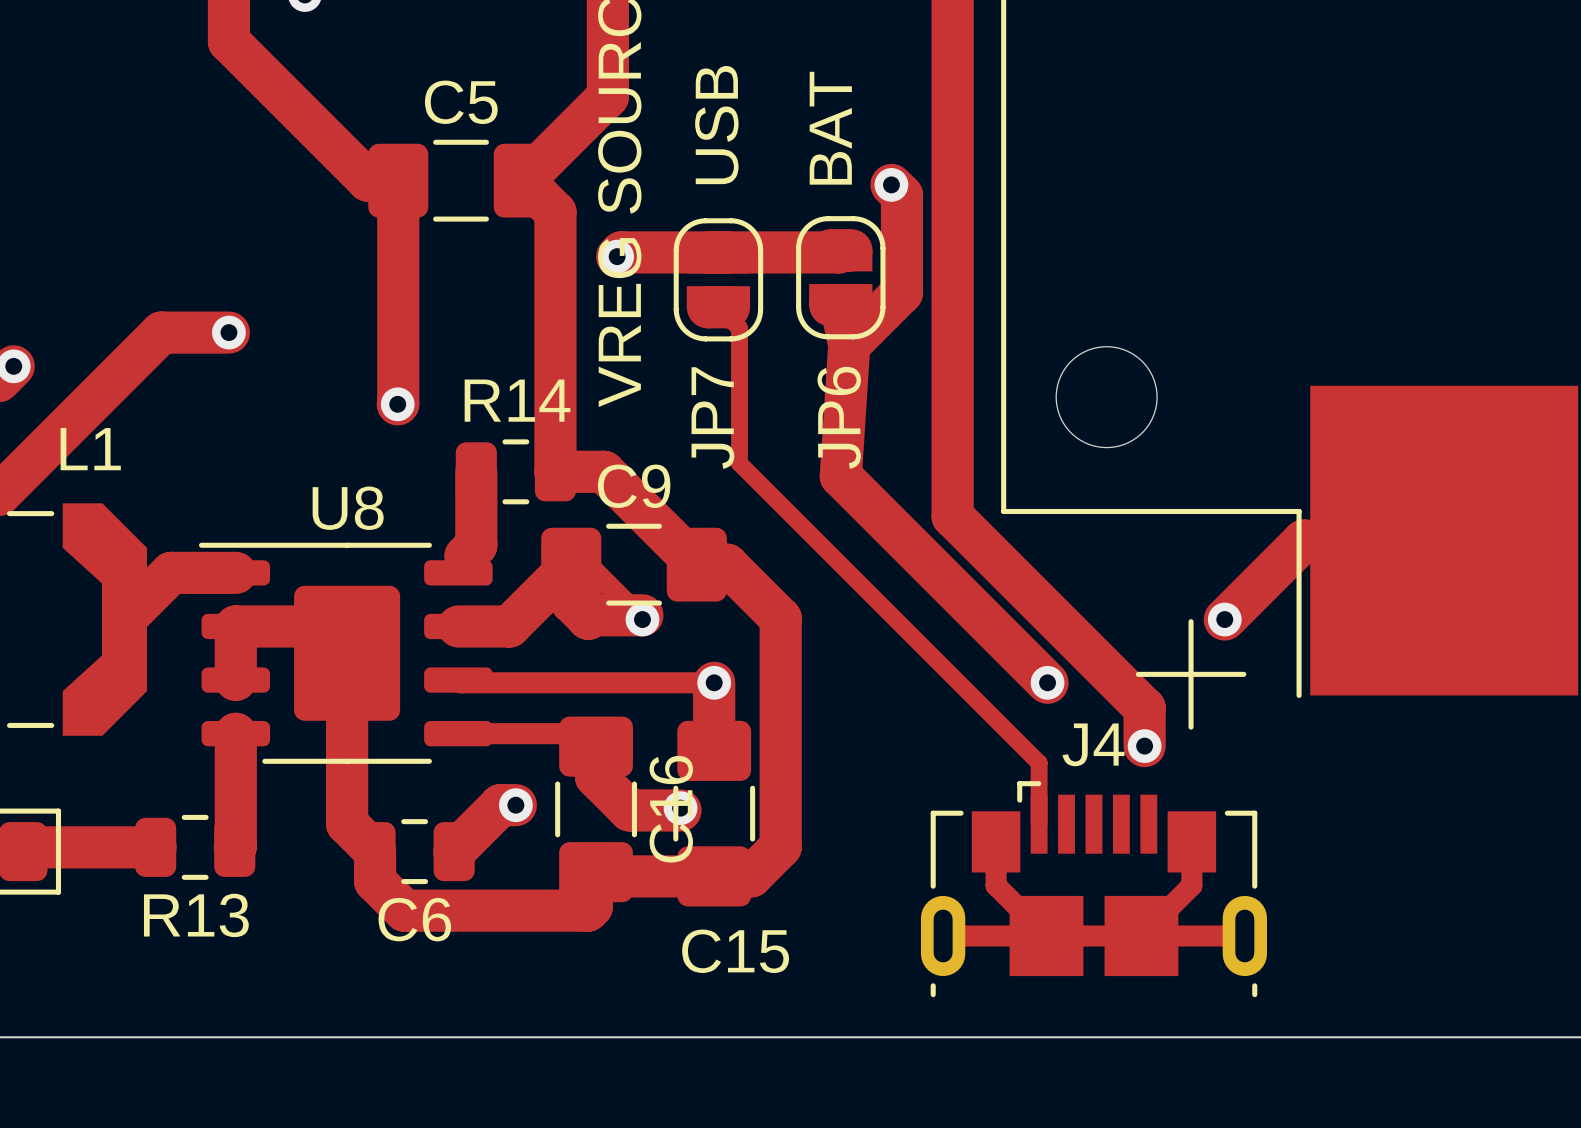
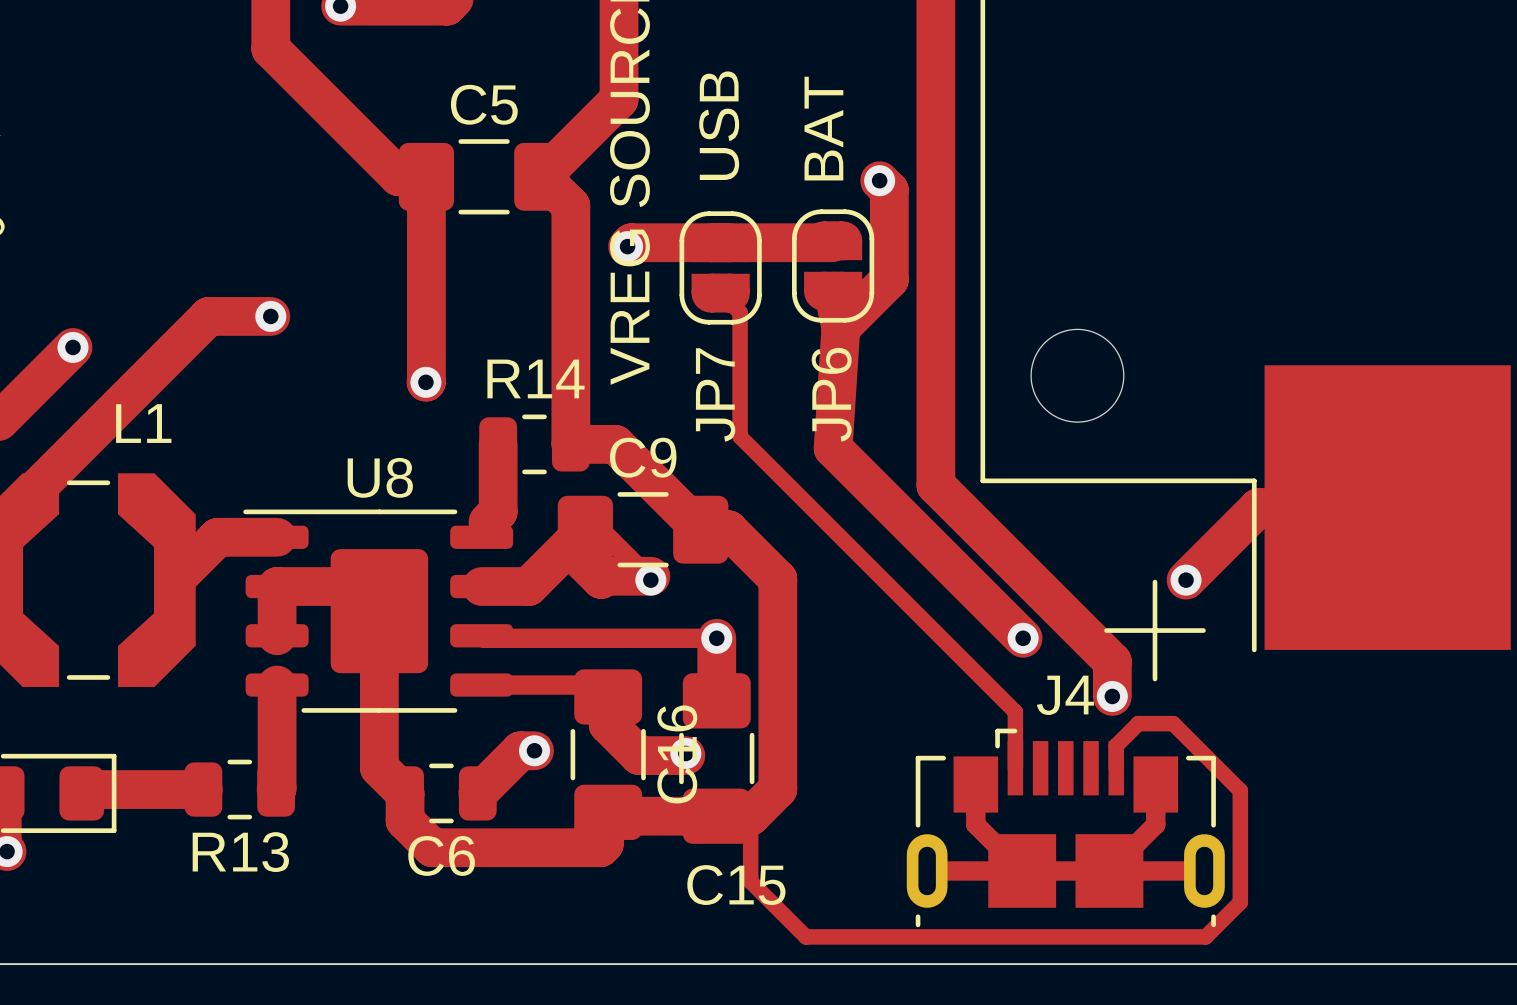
track: none -> (1116, 768) (1116, 745) (1138, 723) (1173, 723) (1240, 790) (1240, 902) (1205, 936) (805, 936) (750, 881) (750, 816)

